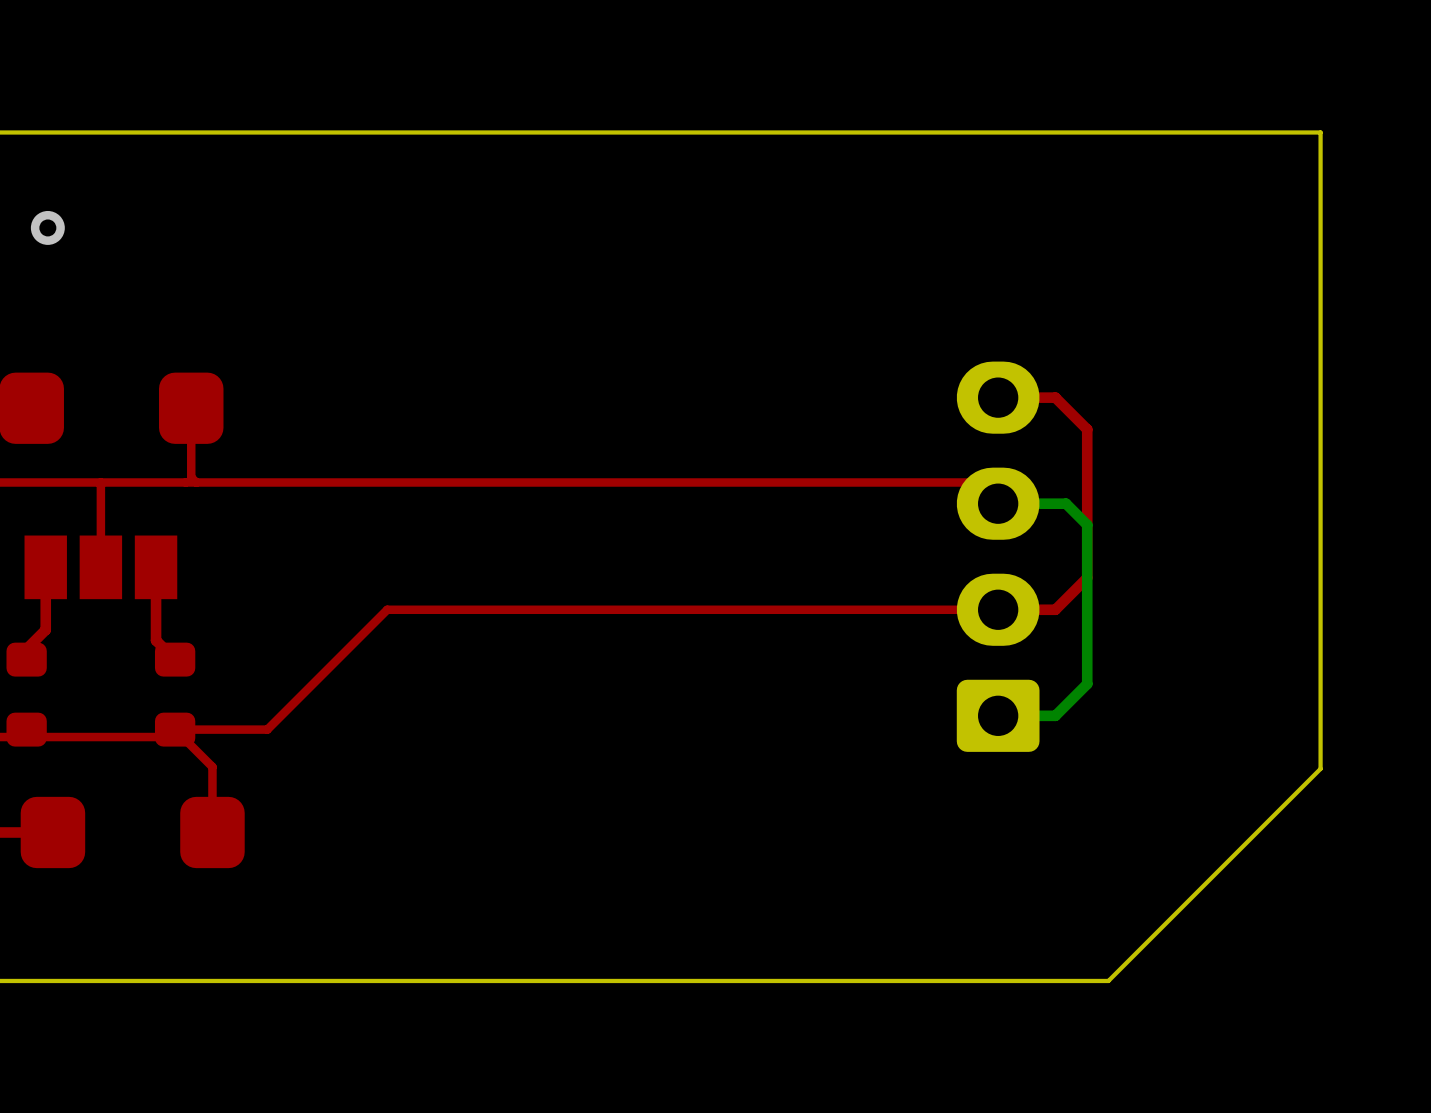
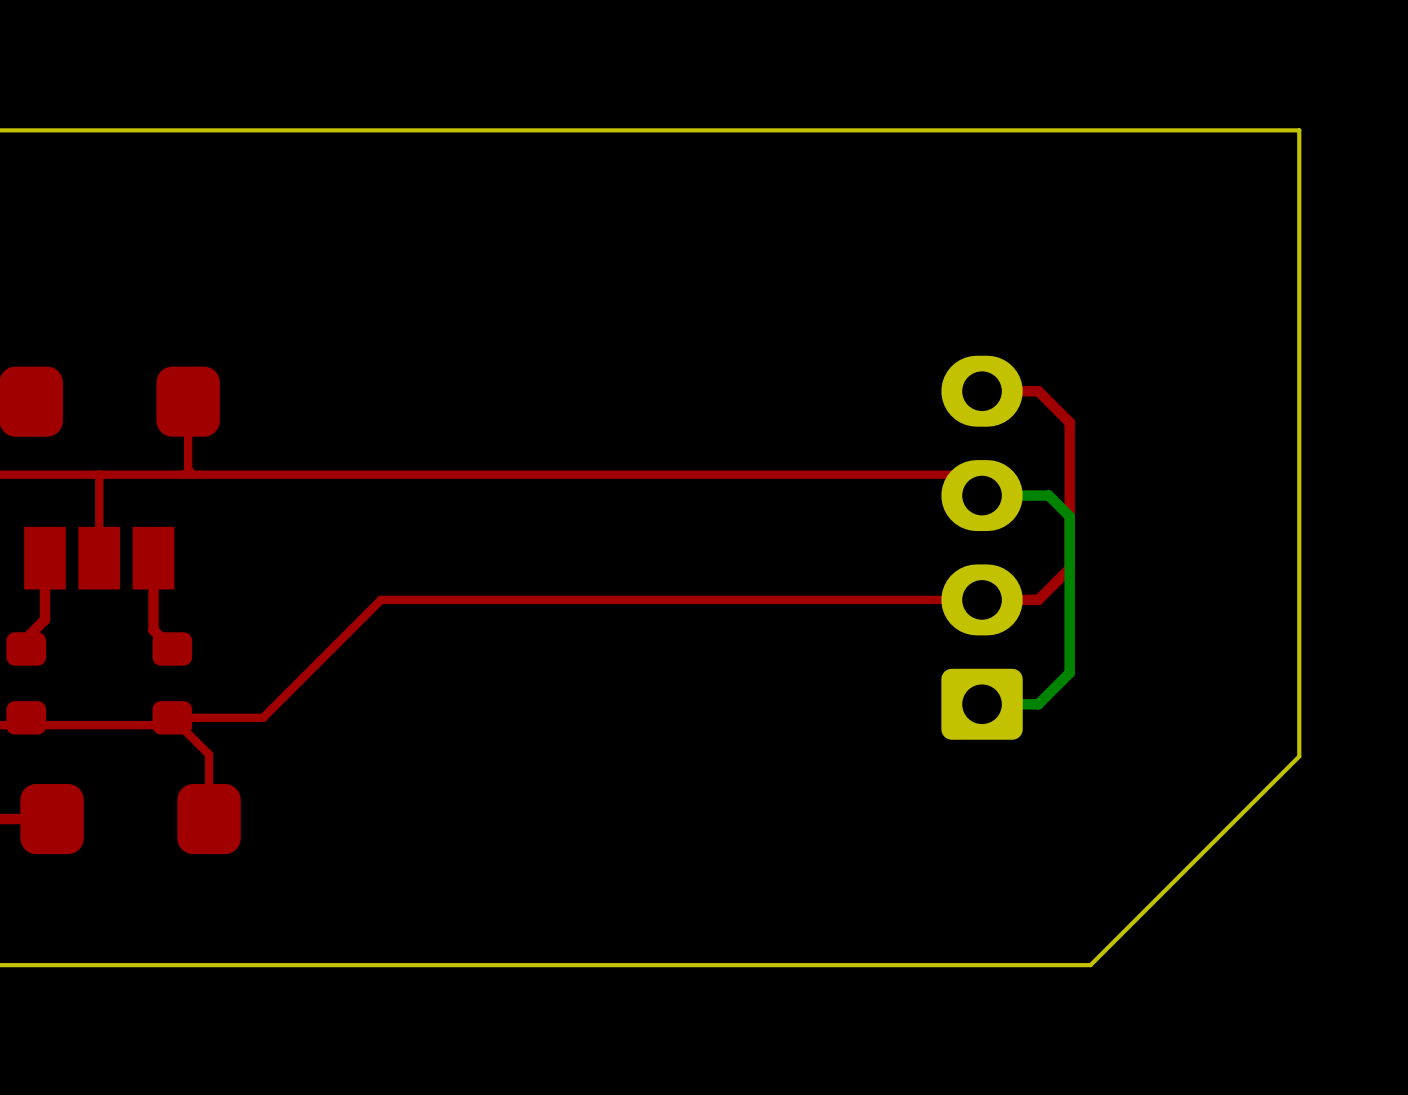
via: (47, 227) -> none

